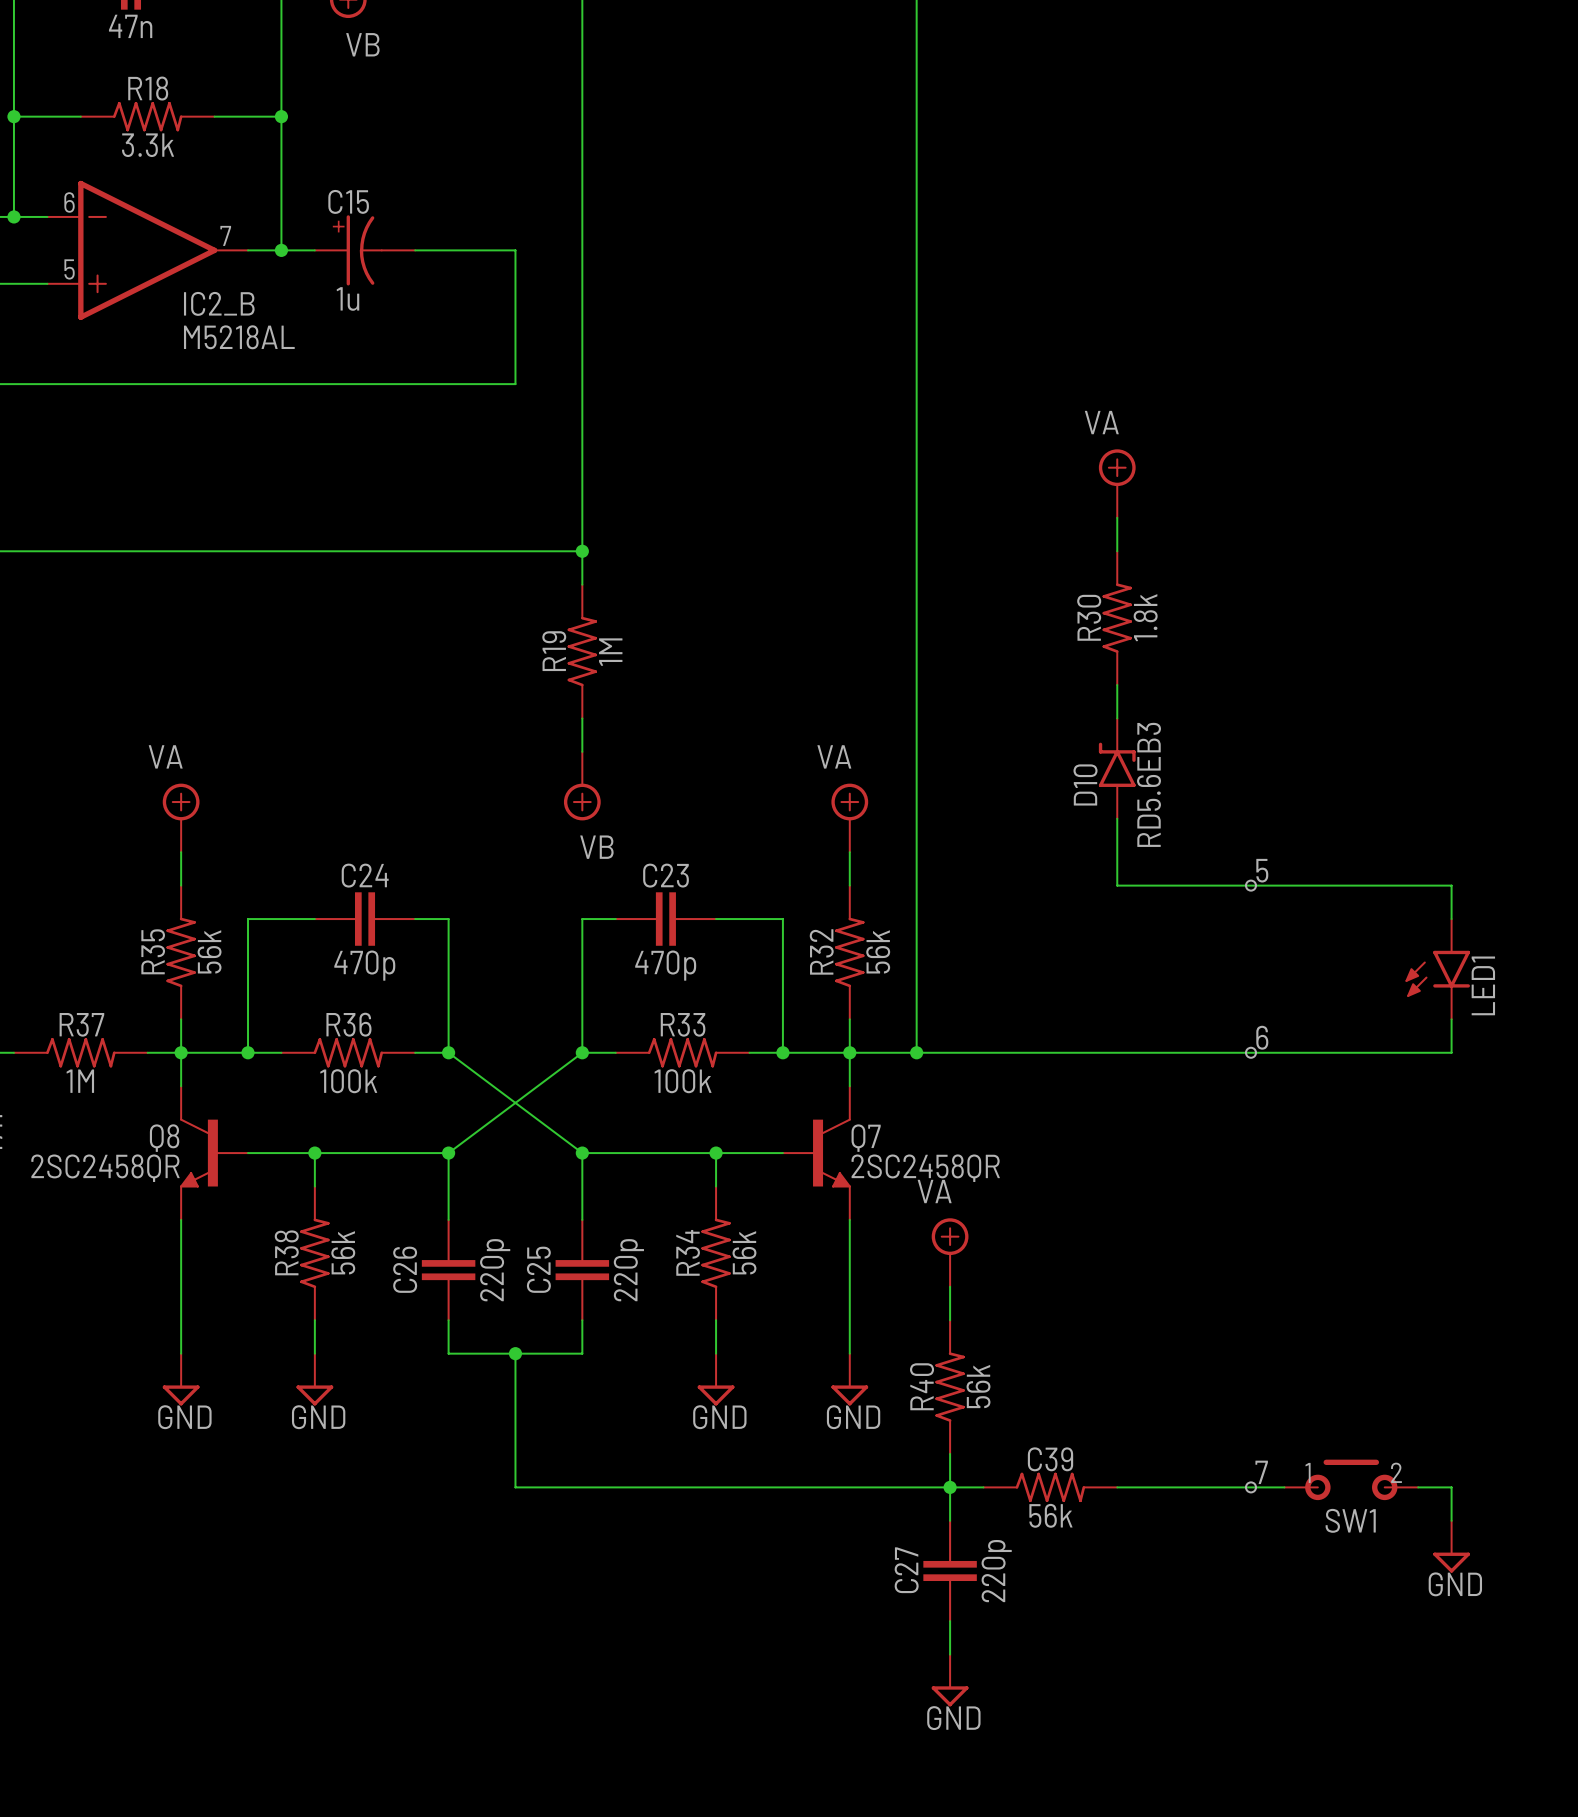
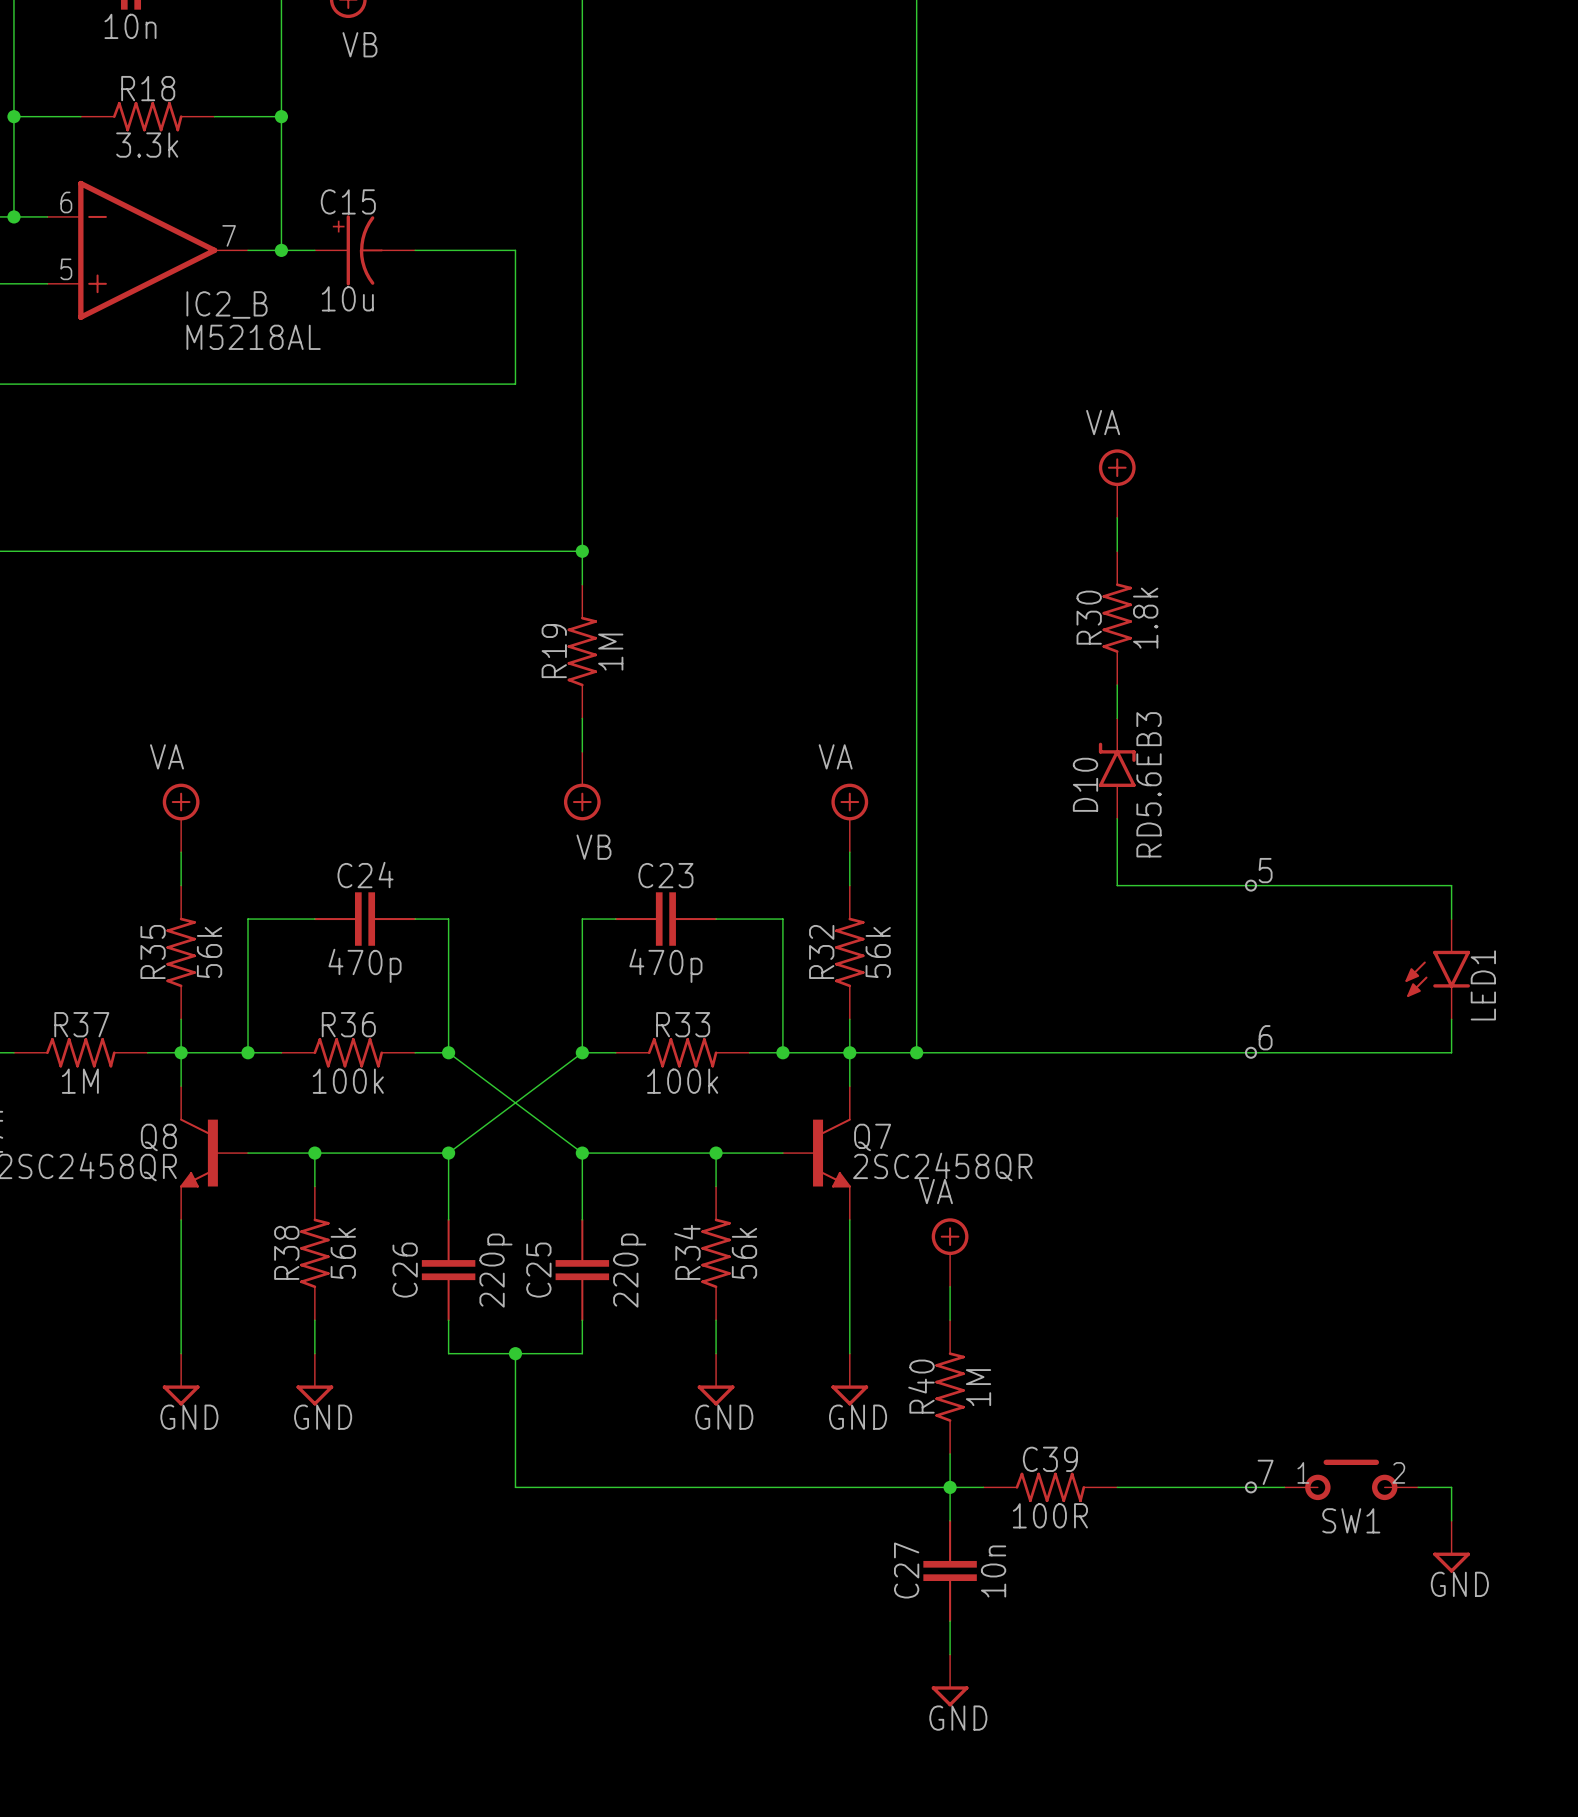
part value: 47n (130, 26) -> 10n (130, 26)
C15 value: 1u (347, 298) -> 10u (347, 298)
R40 value: 56k (978, 1386) -> 1M (978, 1387)
C39 value: 56k (1050, 1515) -> 100R (1050, 1515)
C27 value: 220p (996, 1571) -> 10n (993, 1571)

